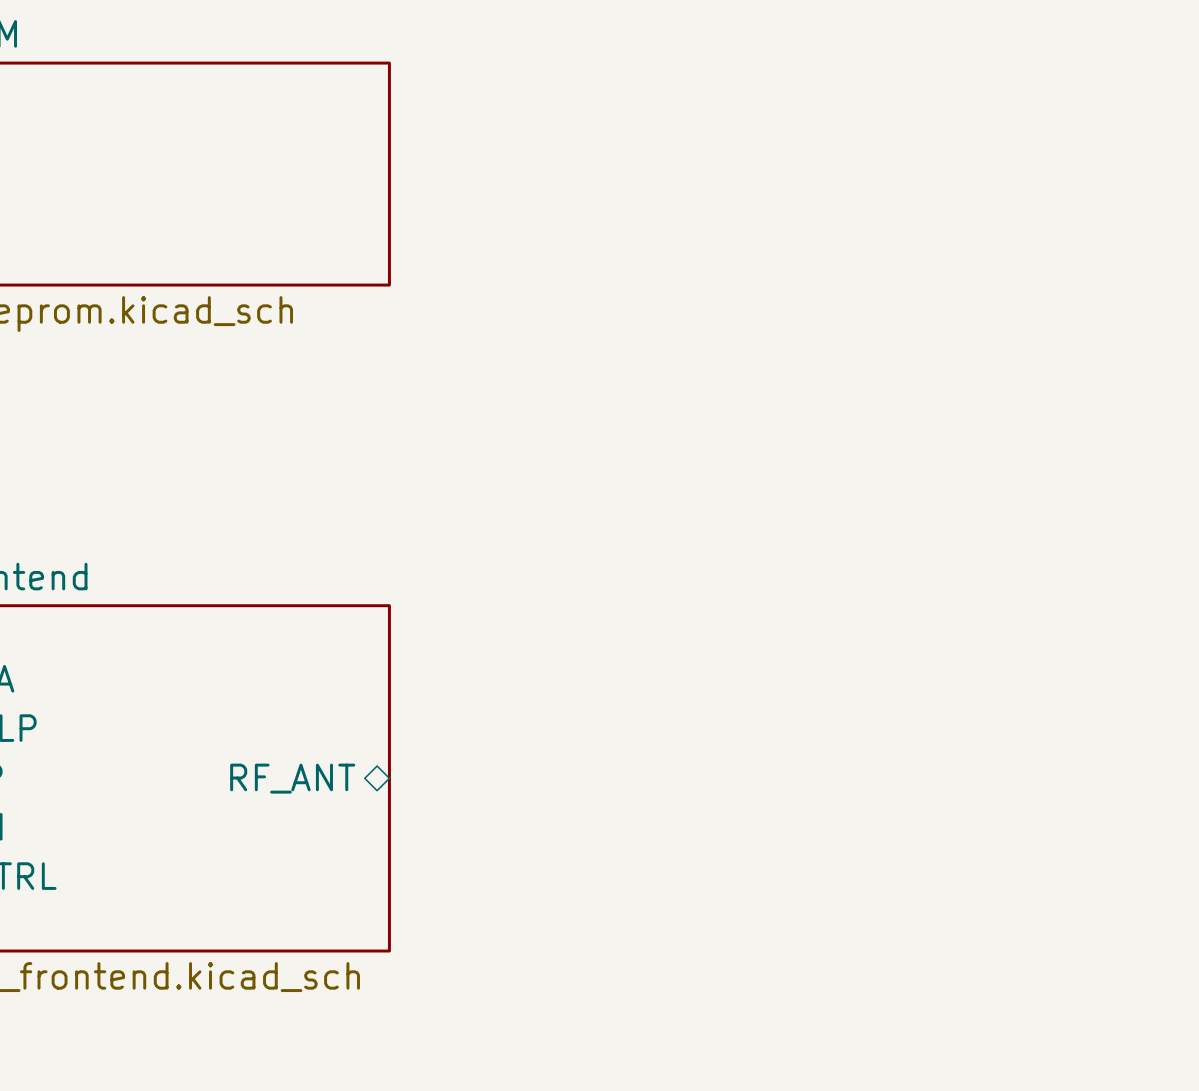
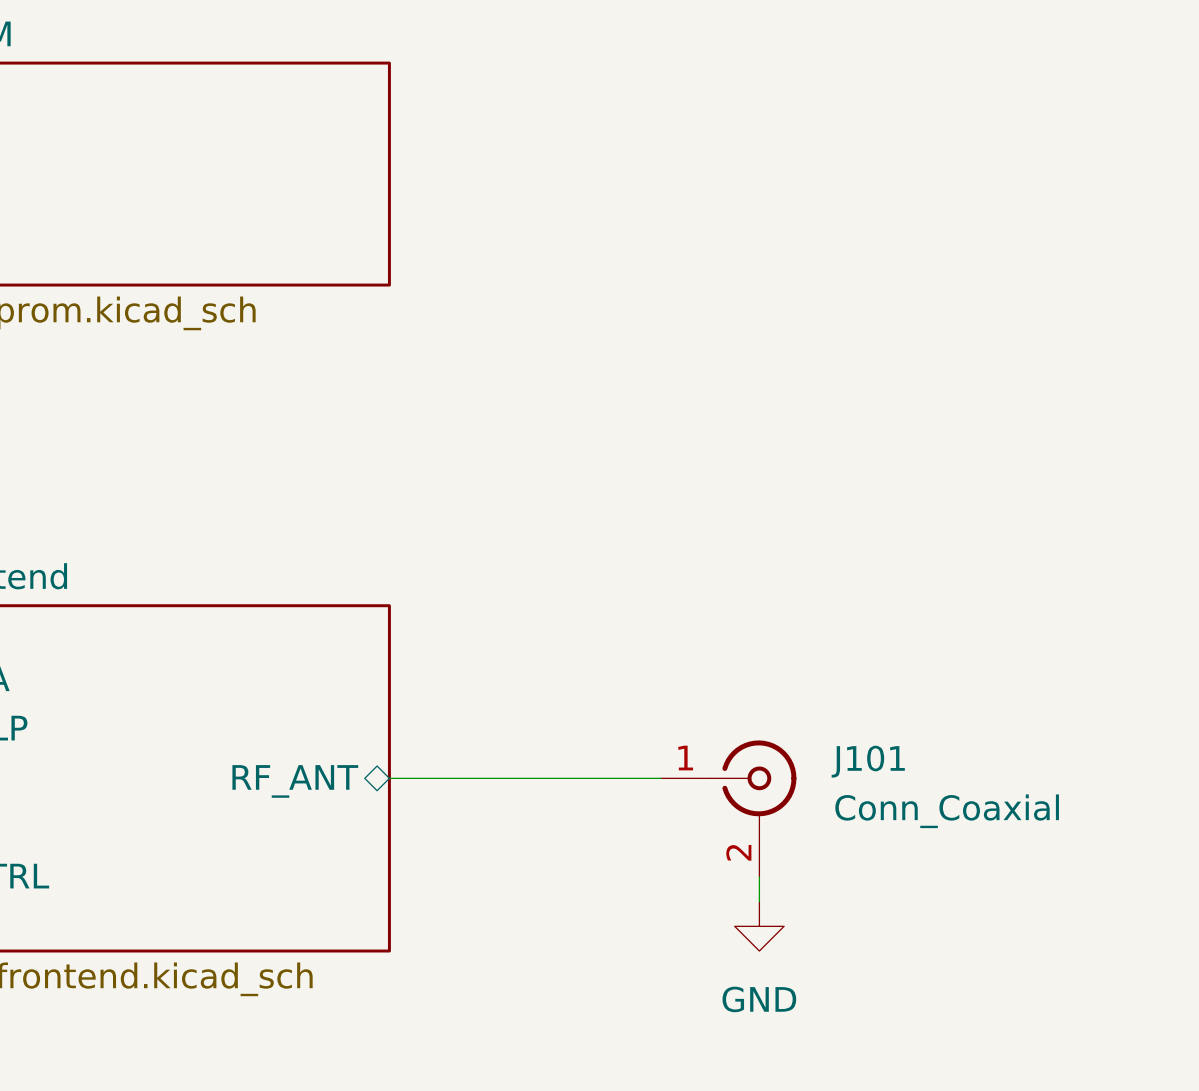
wire: none -> (389, 778) (660, 778)
J101: none -> Conn_Coaxial (728, 808)
wire: none -> (759, 877) (759, 901)
power symbol: none -> GND (759, 926)

